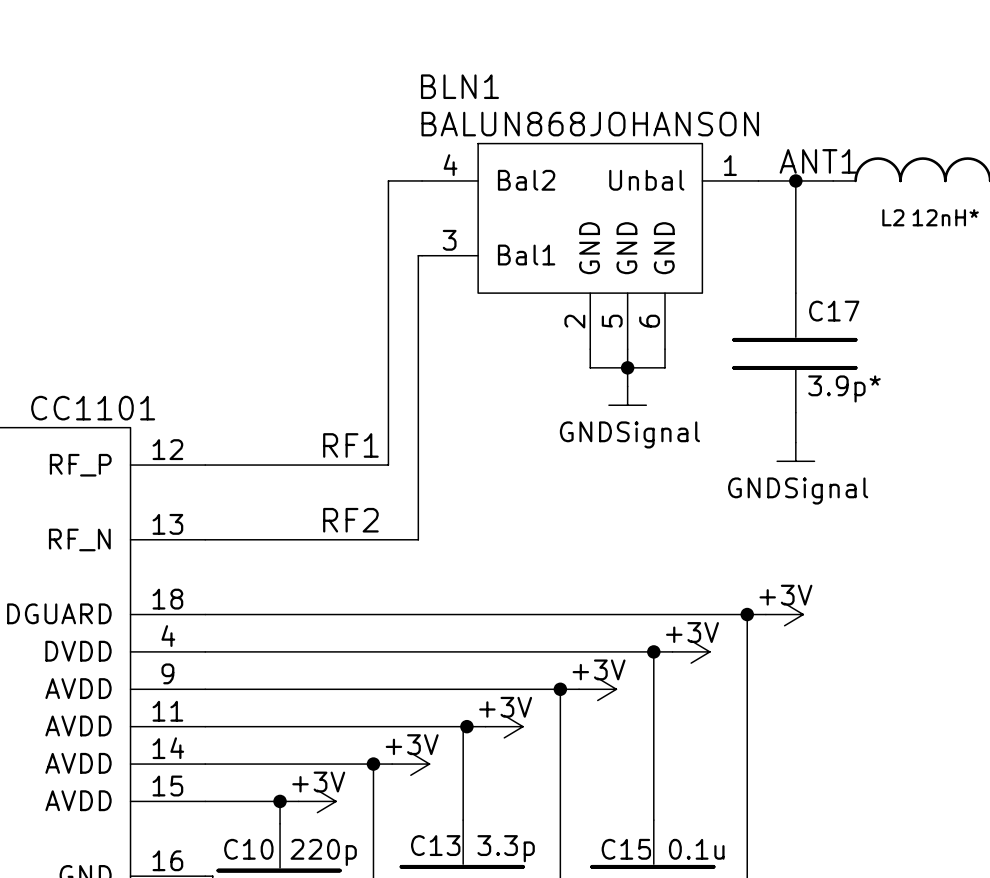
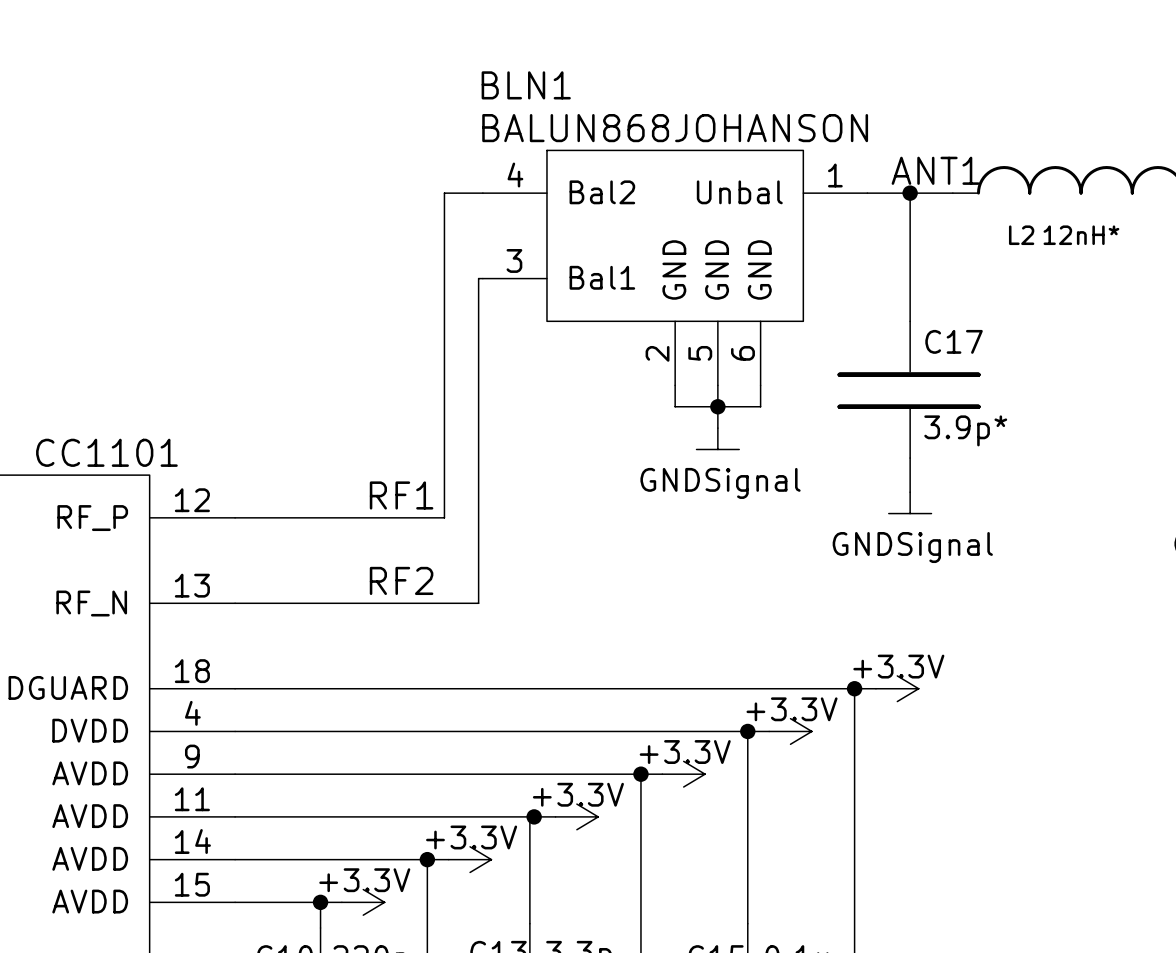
power symbol: +3V (784, 614) -> +3.3V (897, 688)
power symbol: +3V (691, 651) -> +3.3V (790, 731)
power symbol: +3V (597, 689) -> +3.3V (683, 774)
power symbol: +3V (504, 726) -> +3.3V (576, 816)
power symbol: +3V (410, 764) -> +3.3V (470, 859)
power symbol: +3V (317, 801) -> +3.3V (363, 902)

